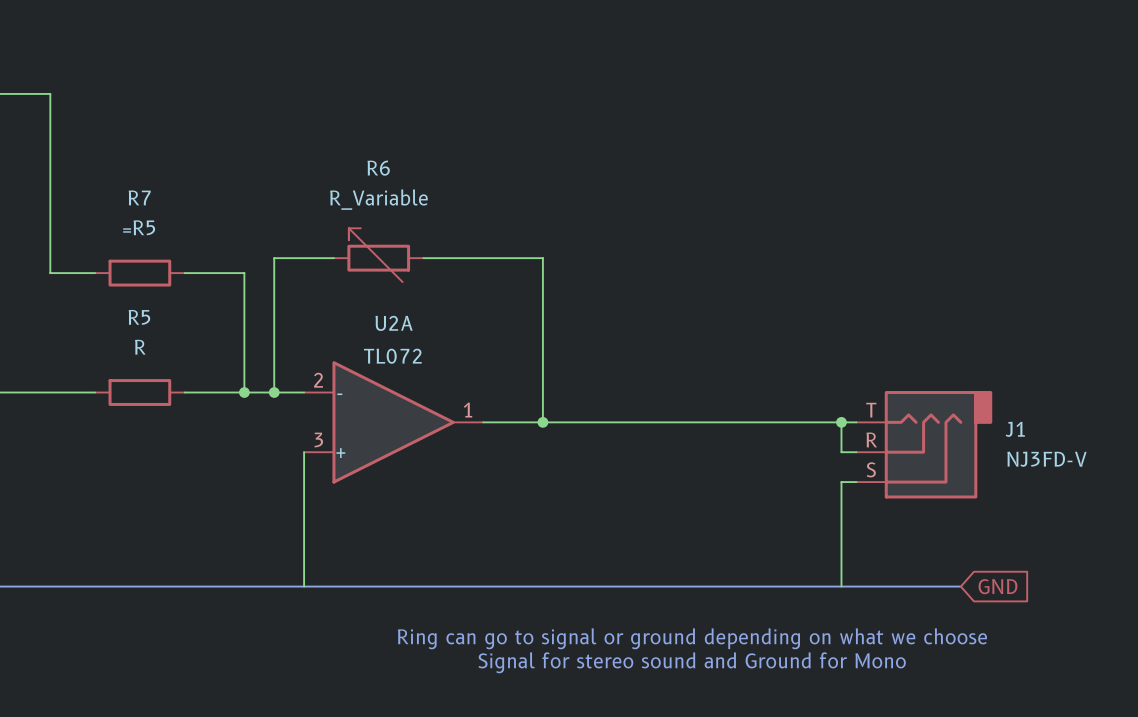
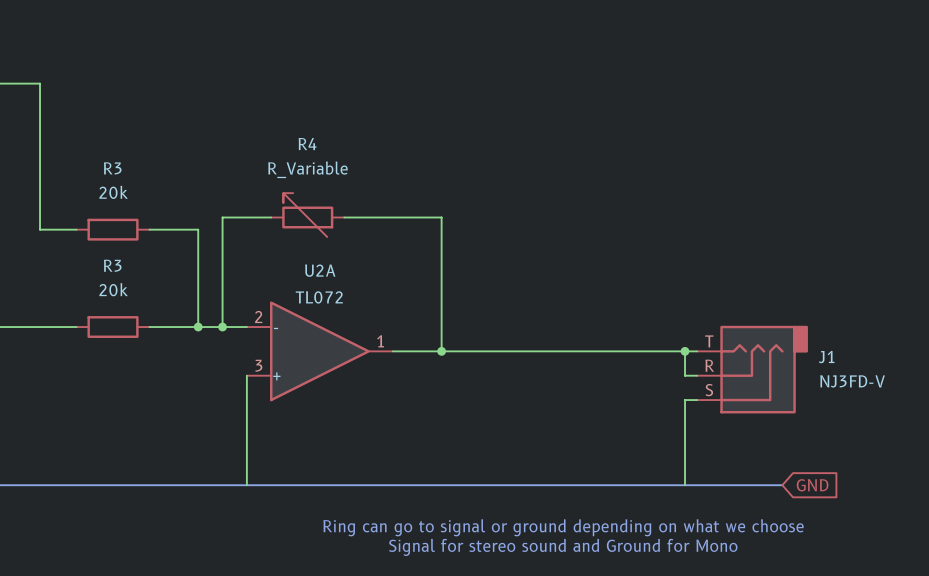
R6 name: R6 (378, 168) -> R4 (307, 144)
R7 name: R7 (139, 197) -> R3 (112, 168)
R7 value: =R5 (139, 227) -> 20k (113, 192)
R5 name: R5 (139, 317) -> R3 (112, 265)
R5 value: R (140, 347) -> 20k (113, 289)

